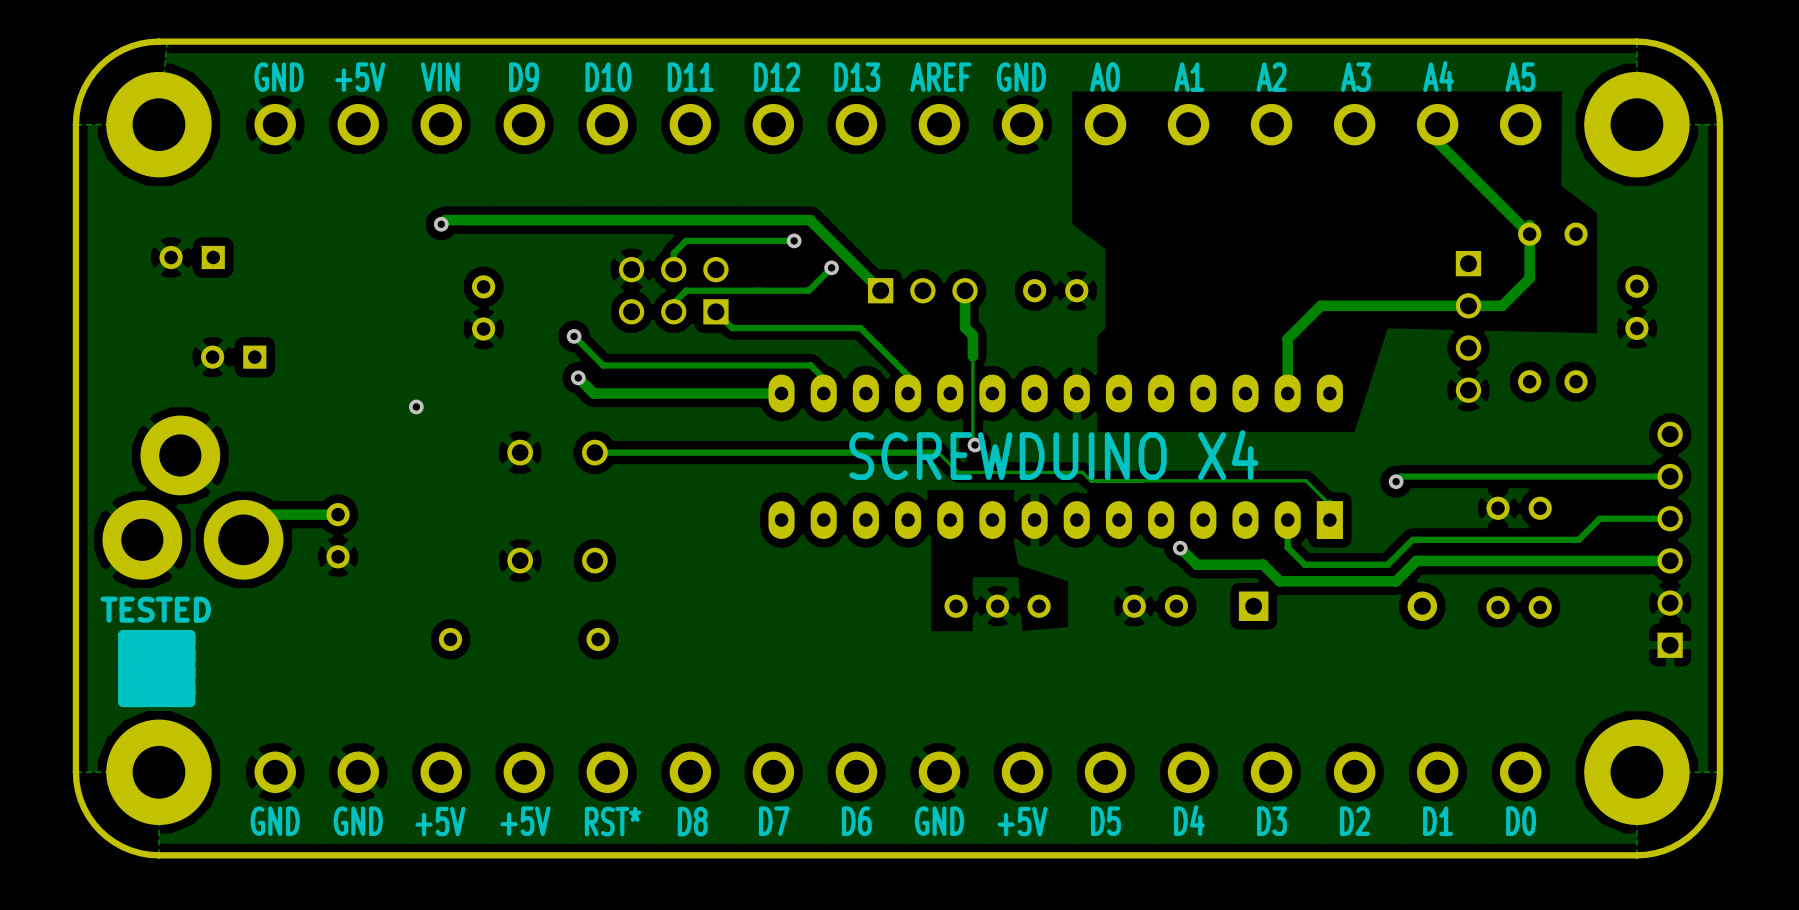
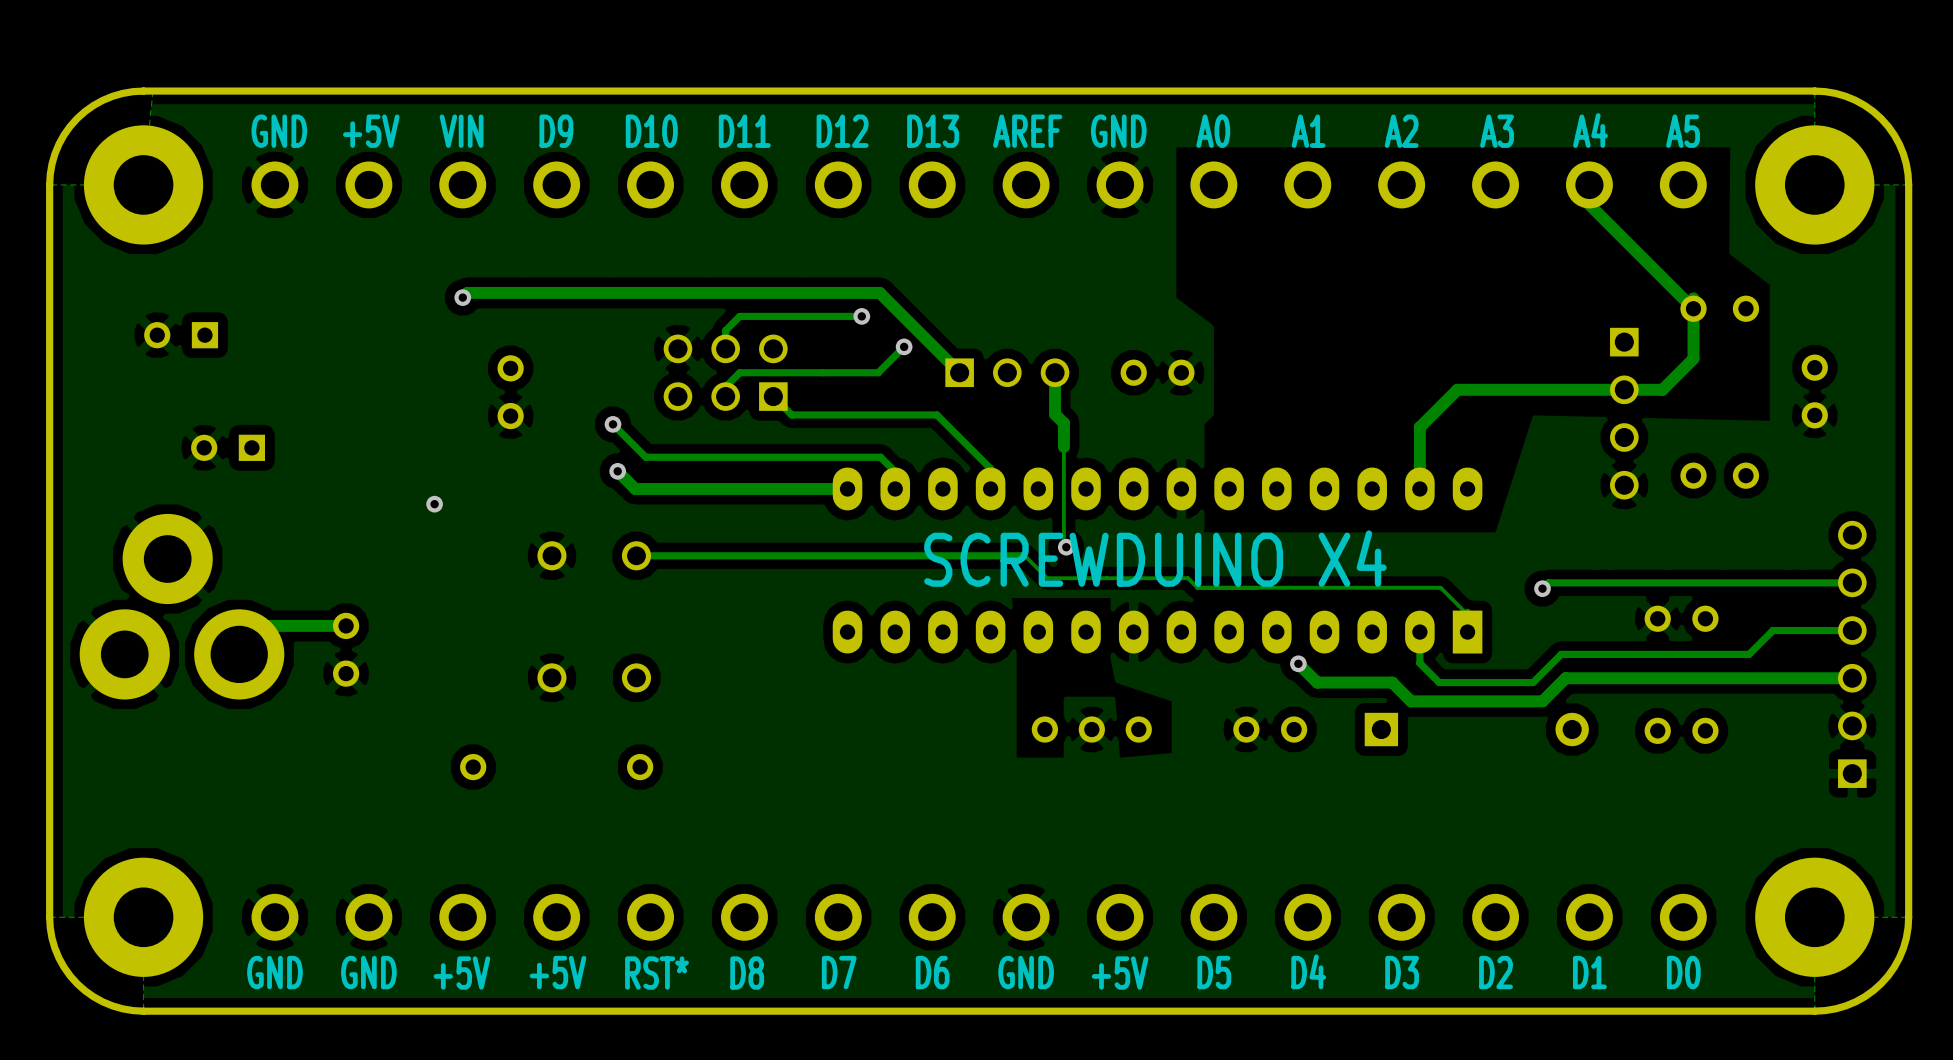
TESTED: (156, 668) -> none

